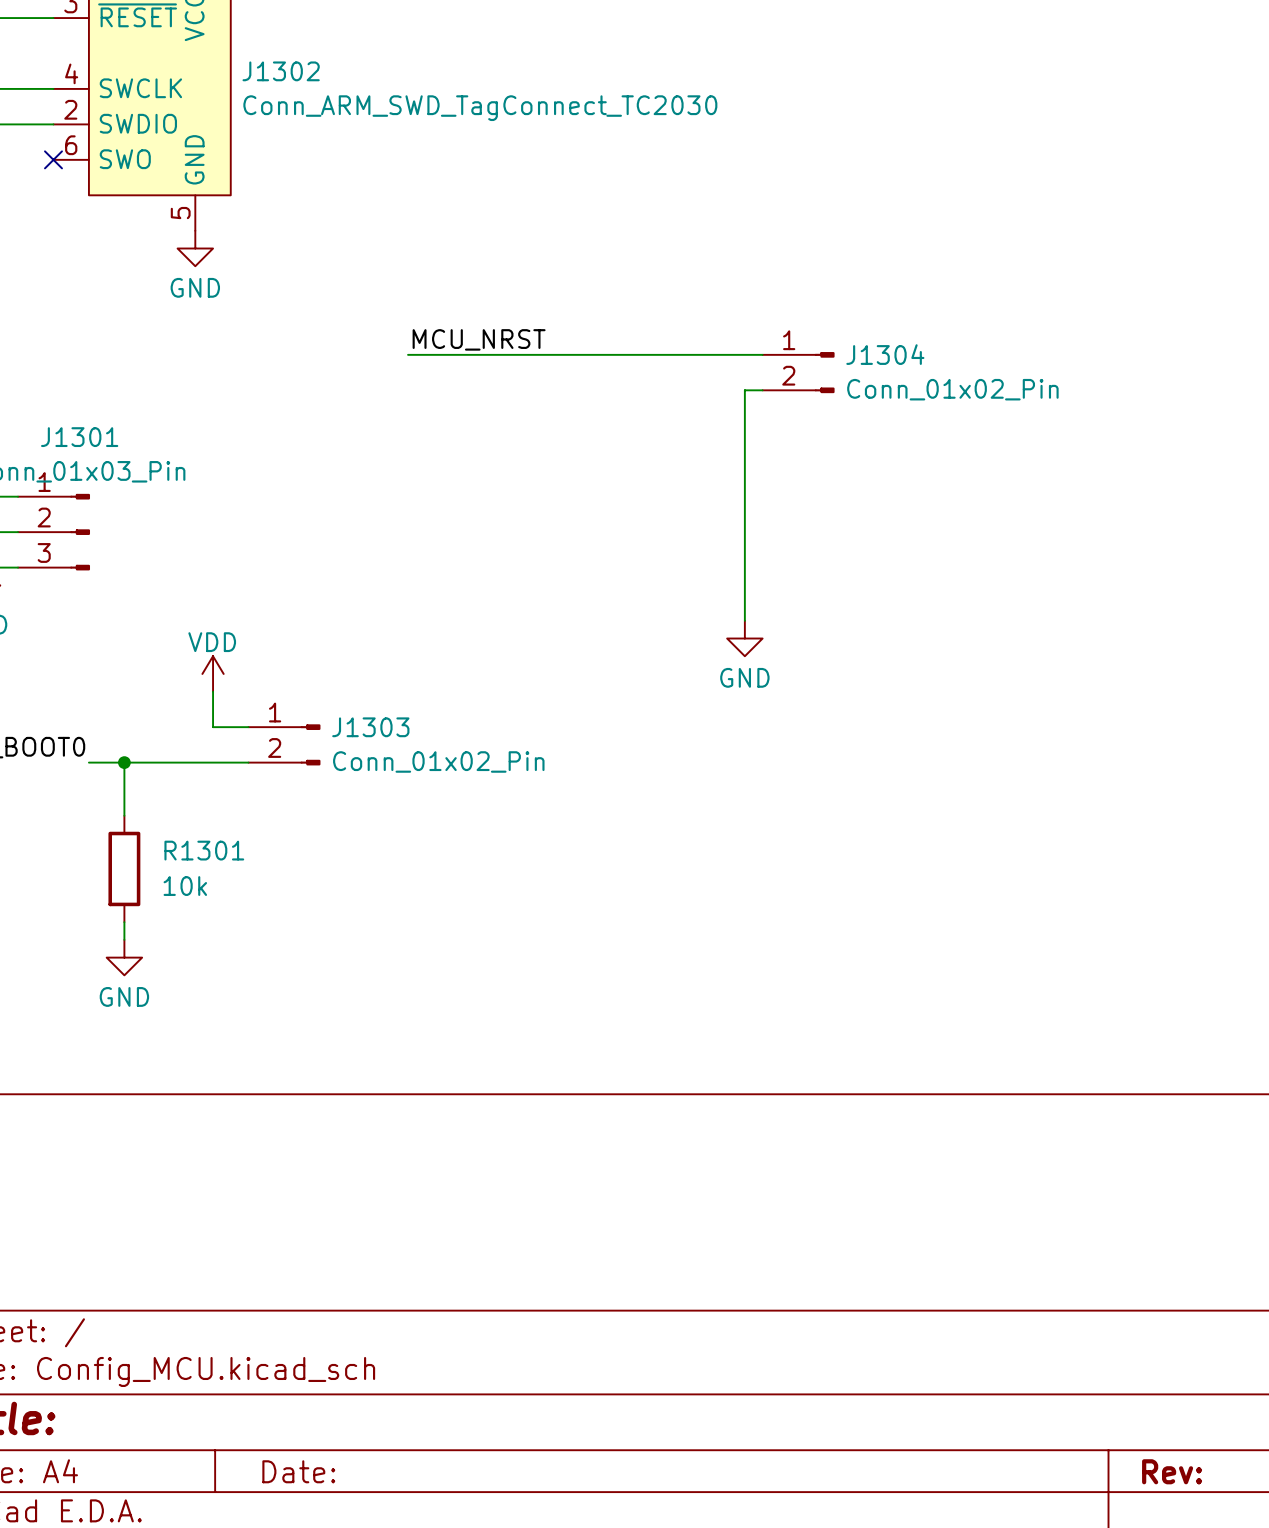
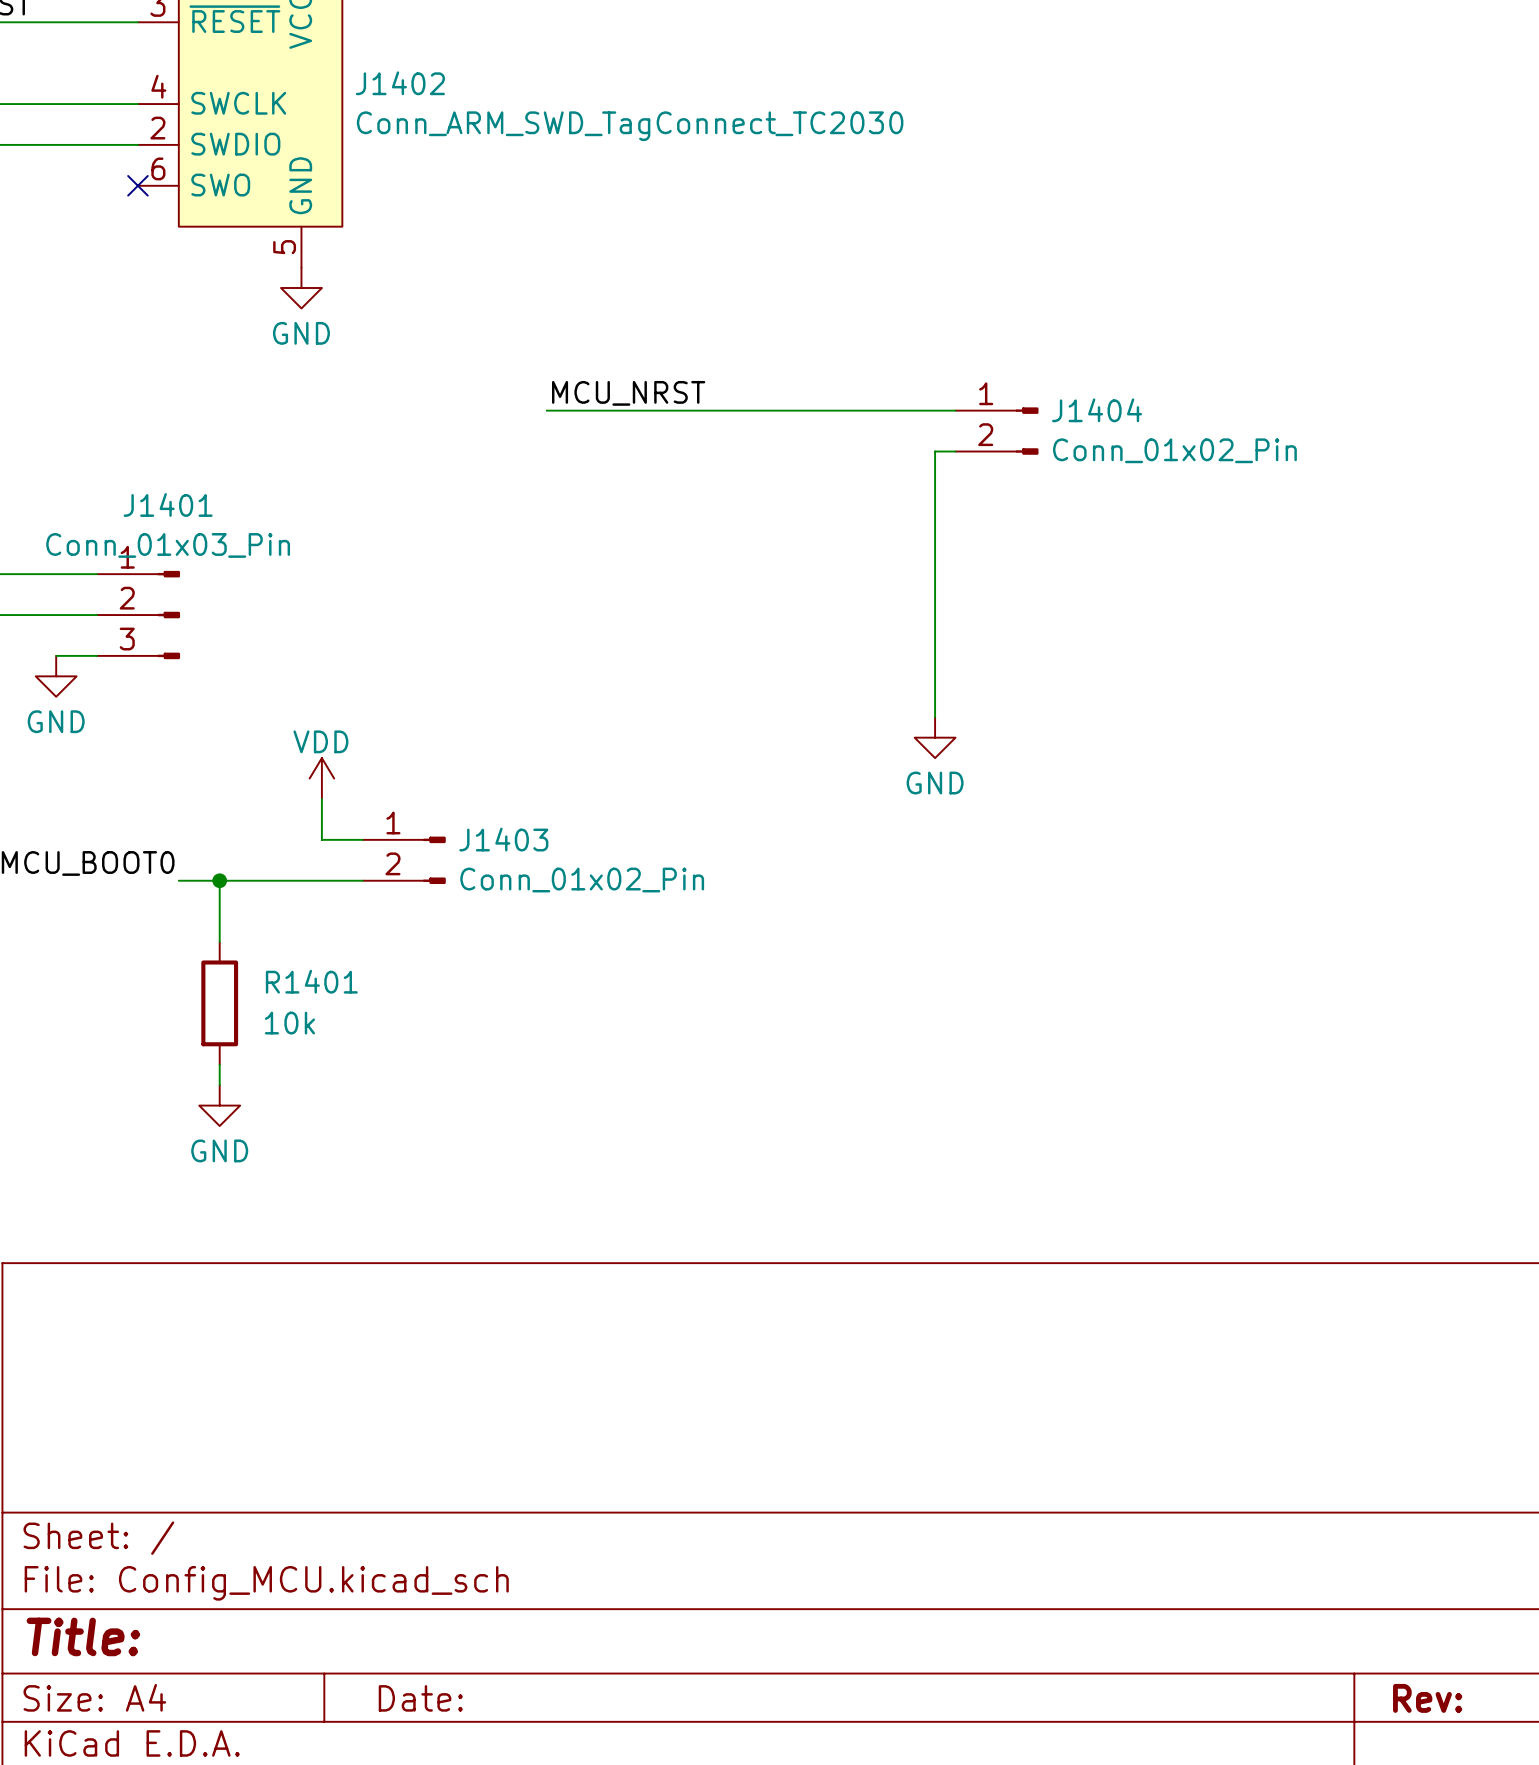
J1302 name: J1302 (281, 71) -> J1402 (400, 83)
J1304 name: J1304 (885, 354) -> J1404 (1097, 410)
J1301 name: J1301 (79, 437) -> J1401 (168, 504)
J1303 name: J1303 (370, 727) -> J1403 (503, 839)
R1301 name: R1301 (204, 850) -> R1401 (311, 981)

